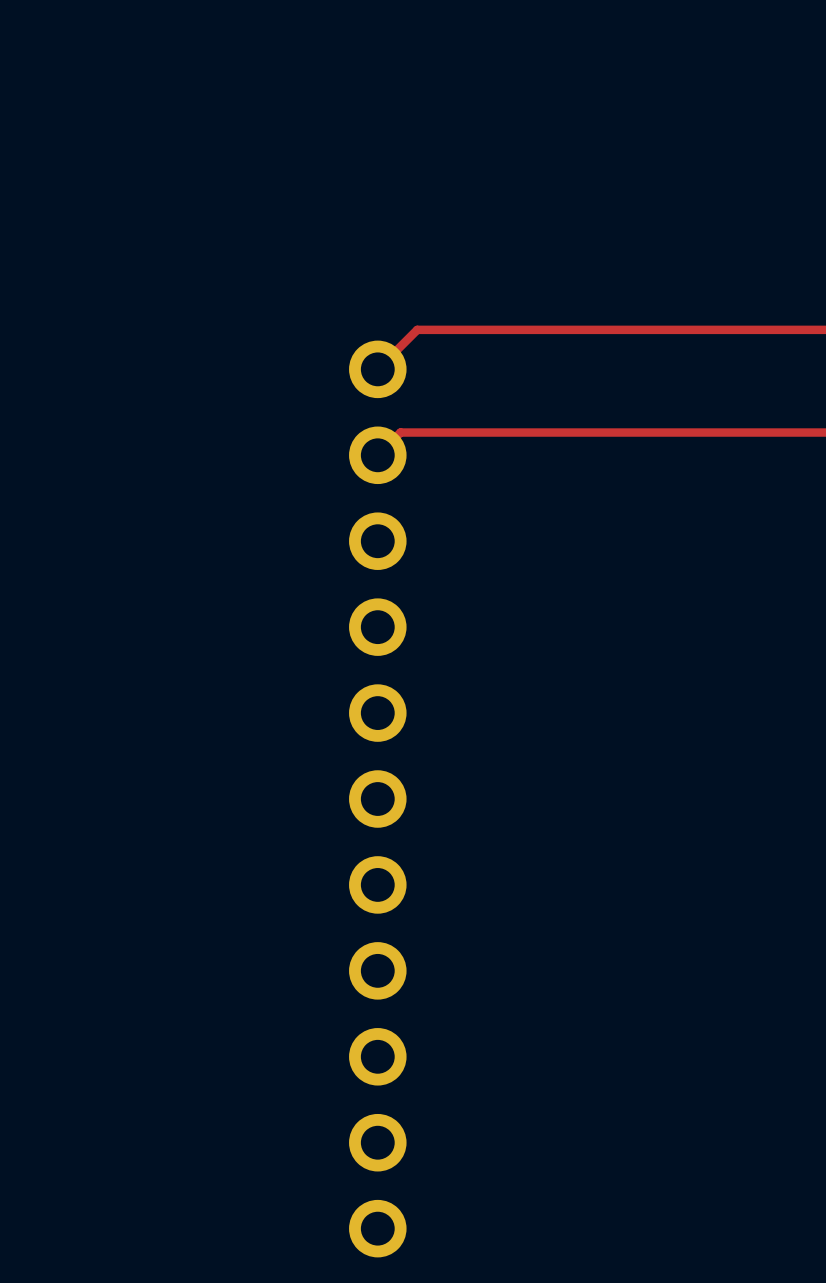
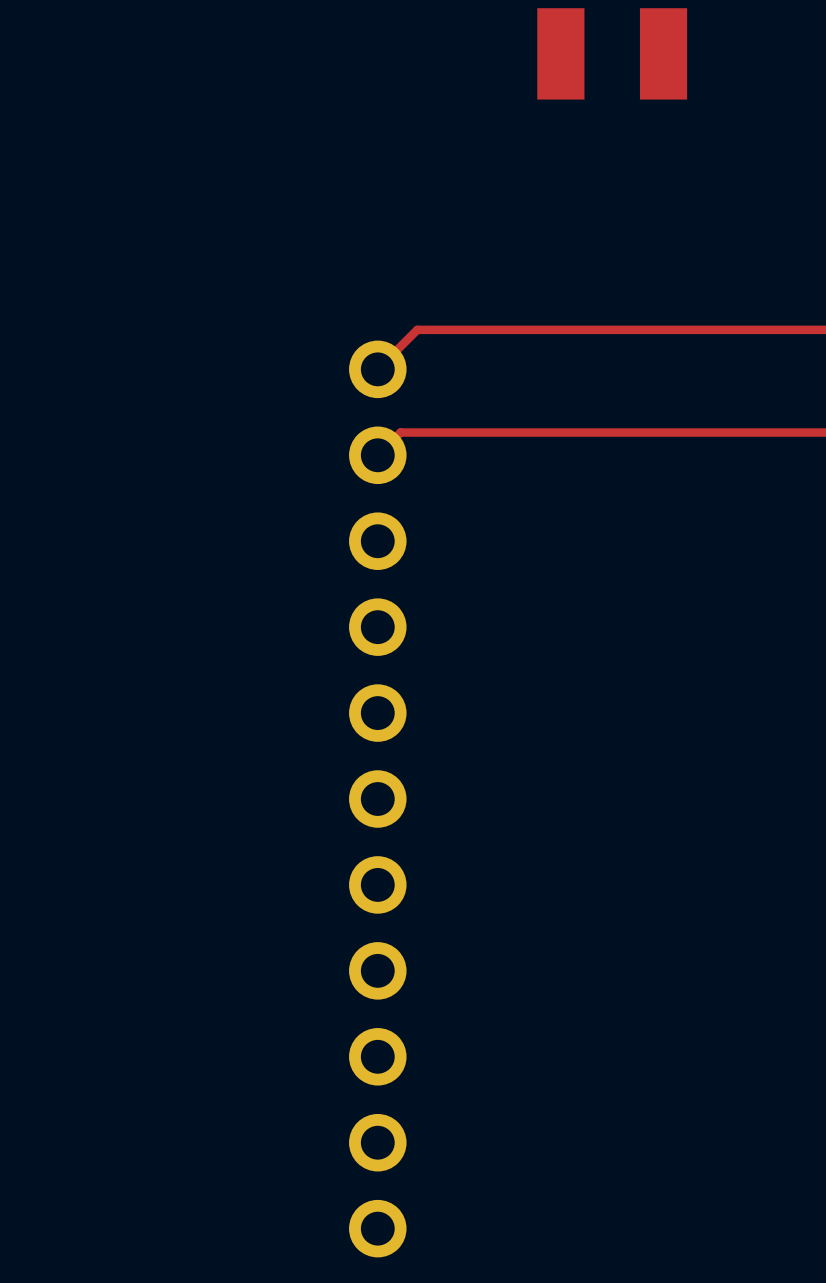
part: none -> (612, 53)

